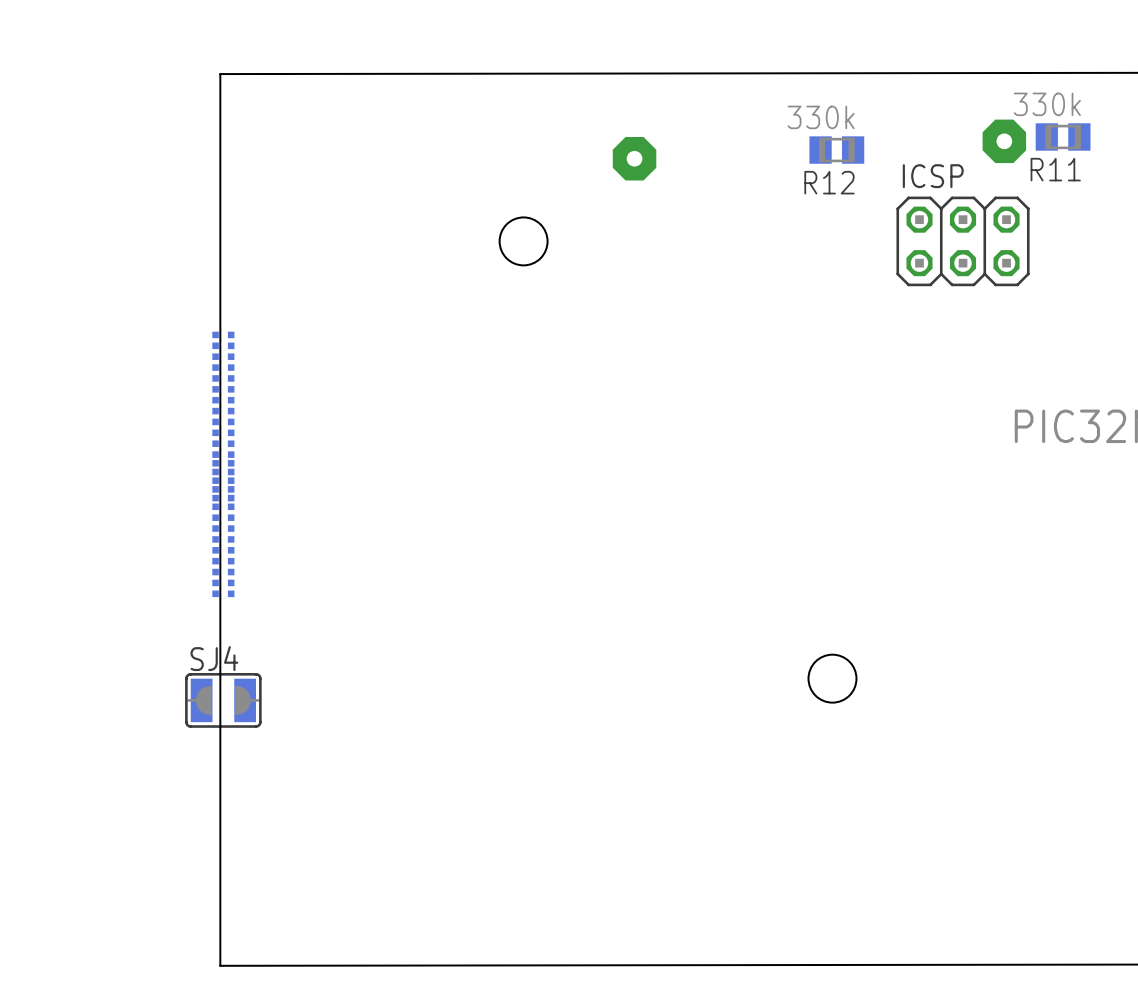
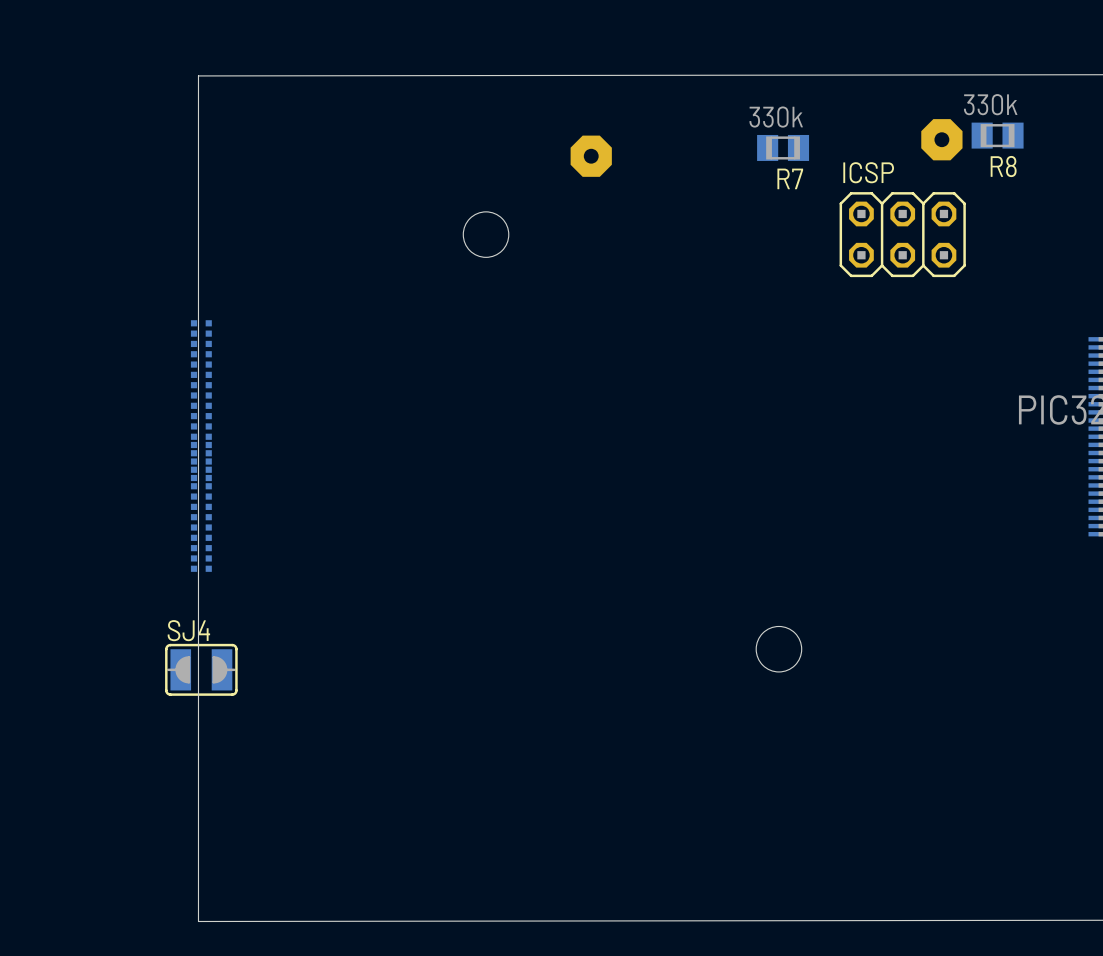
R11 name: R11 (1055, 169) -> R8 (1003, 166)
R12 name: R12 (829, 182) -> R7 (790, 178)

